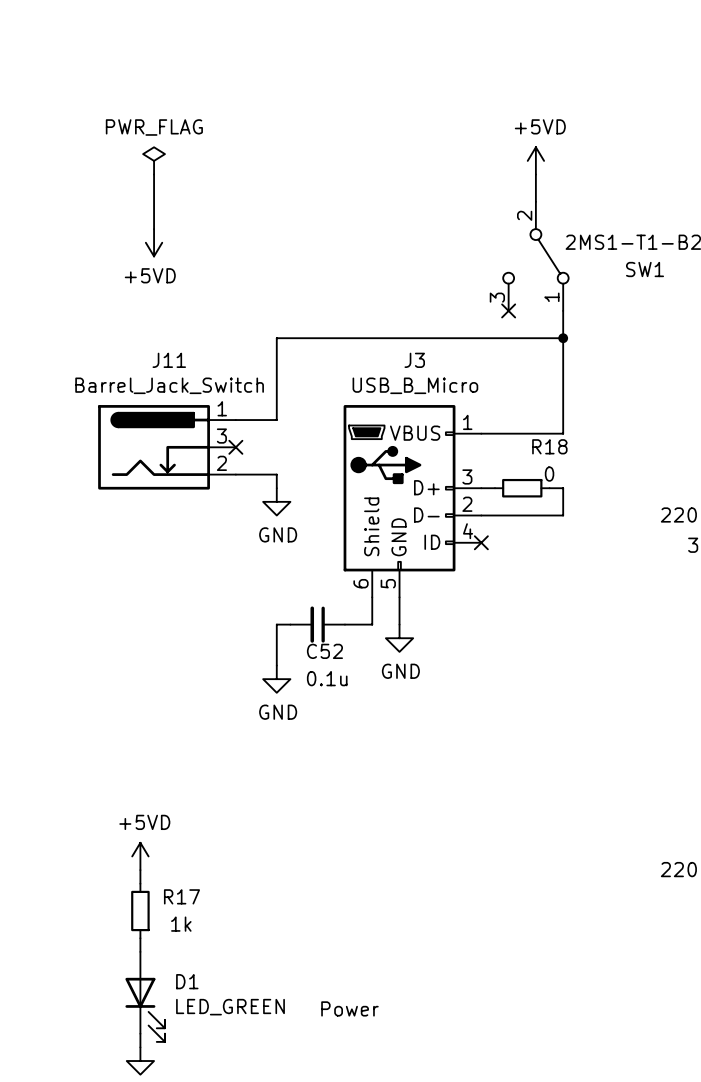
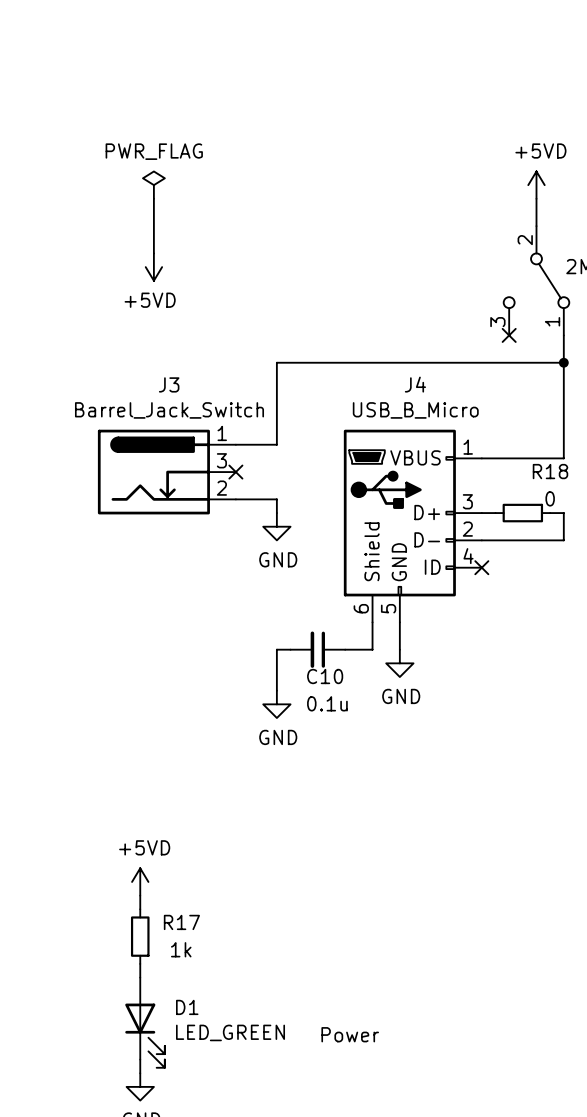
J11 name: J11 (169, 360) -> J3 (169, 384)
J3 name: J3 (414, 360) -> J4 (415, 384)
C52 name: C52 (324, 651) -> C10 (325, 676)

